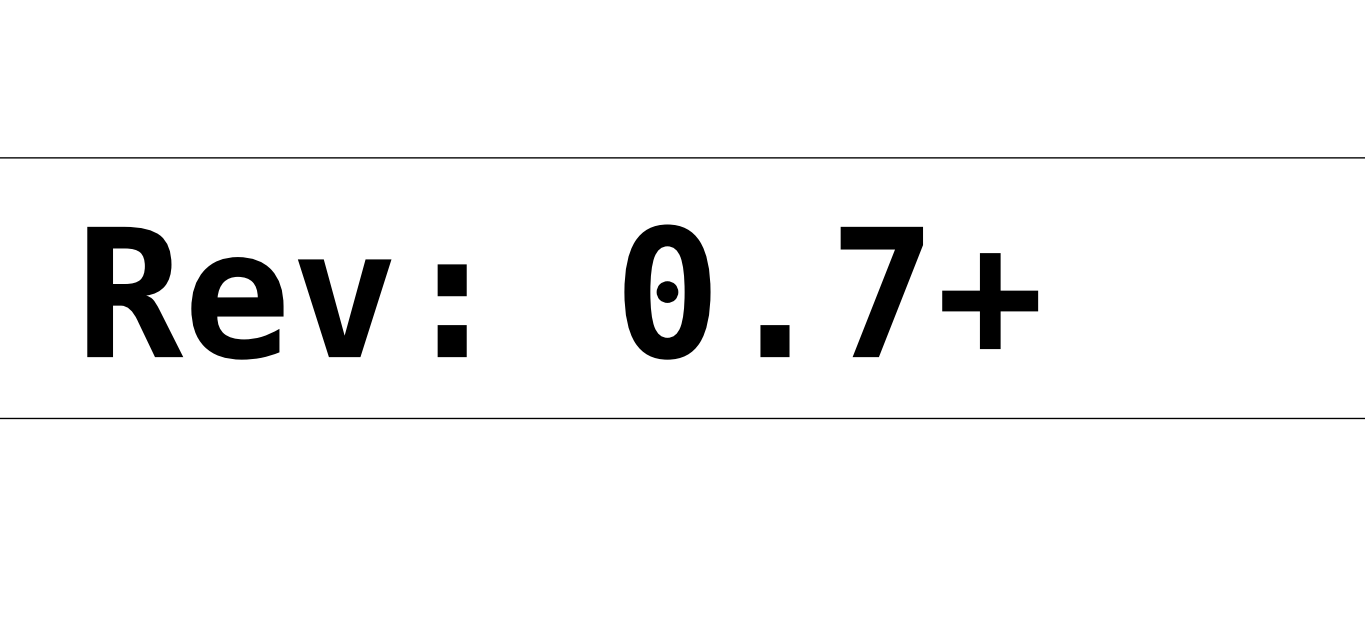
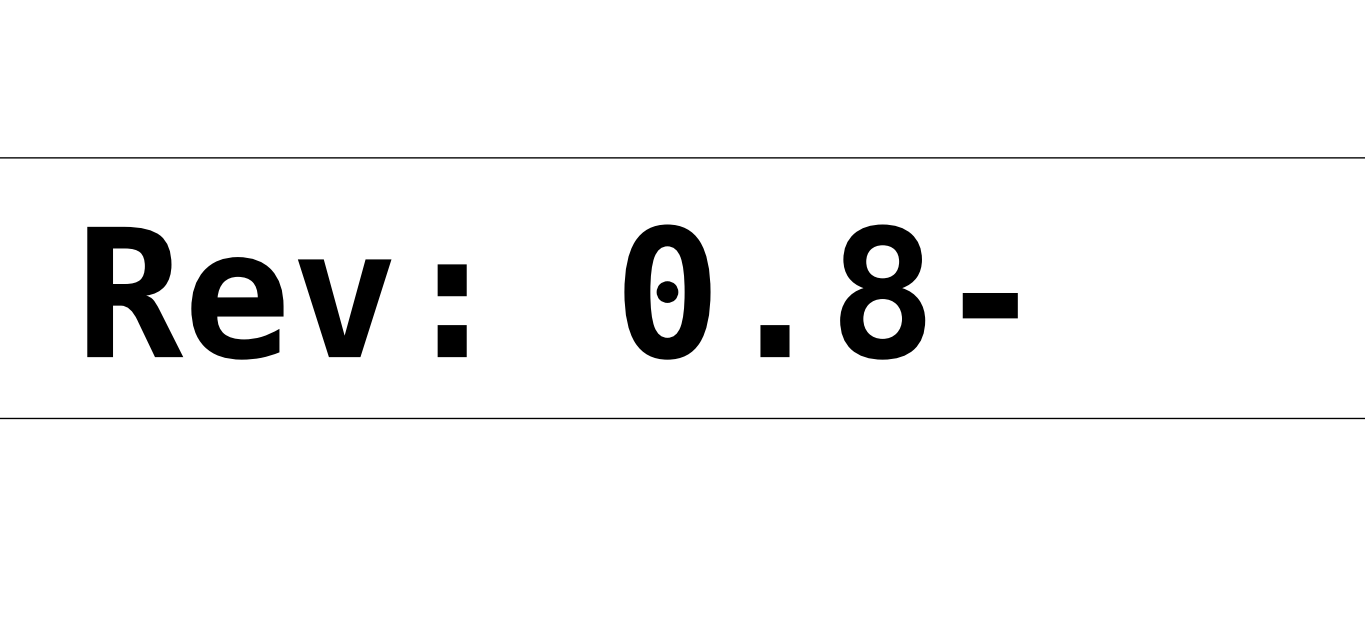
title block: Rev: 0.7+ (562, 292) -> Rev: 0.8- (552, 292)

